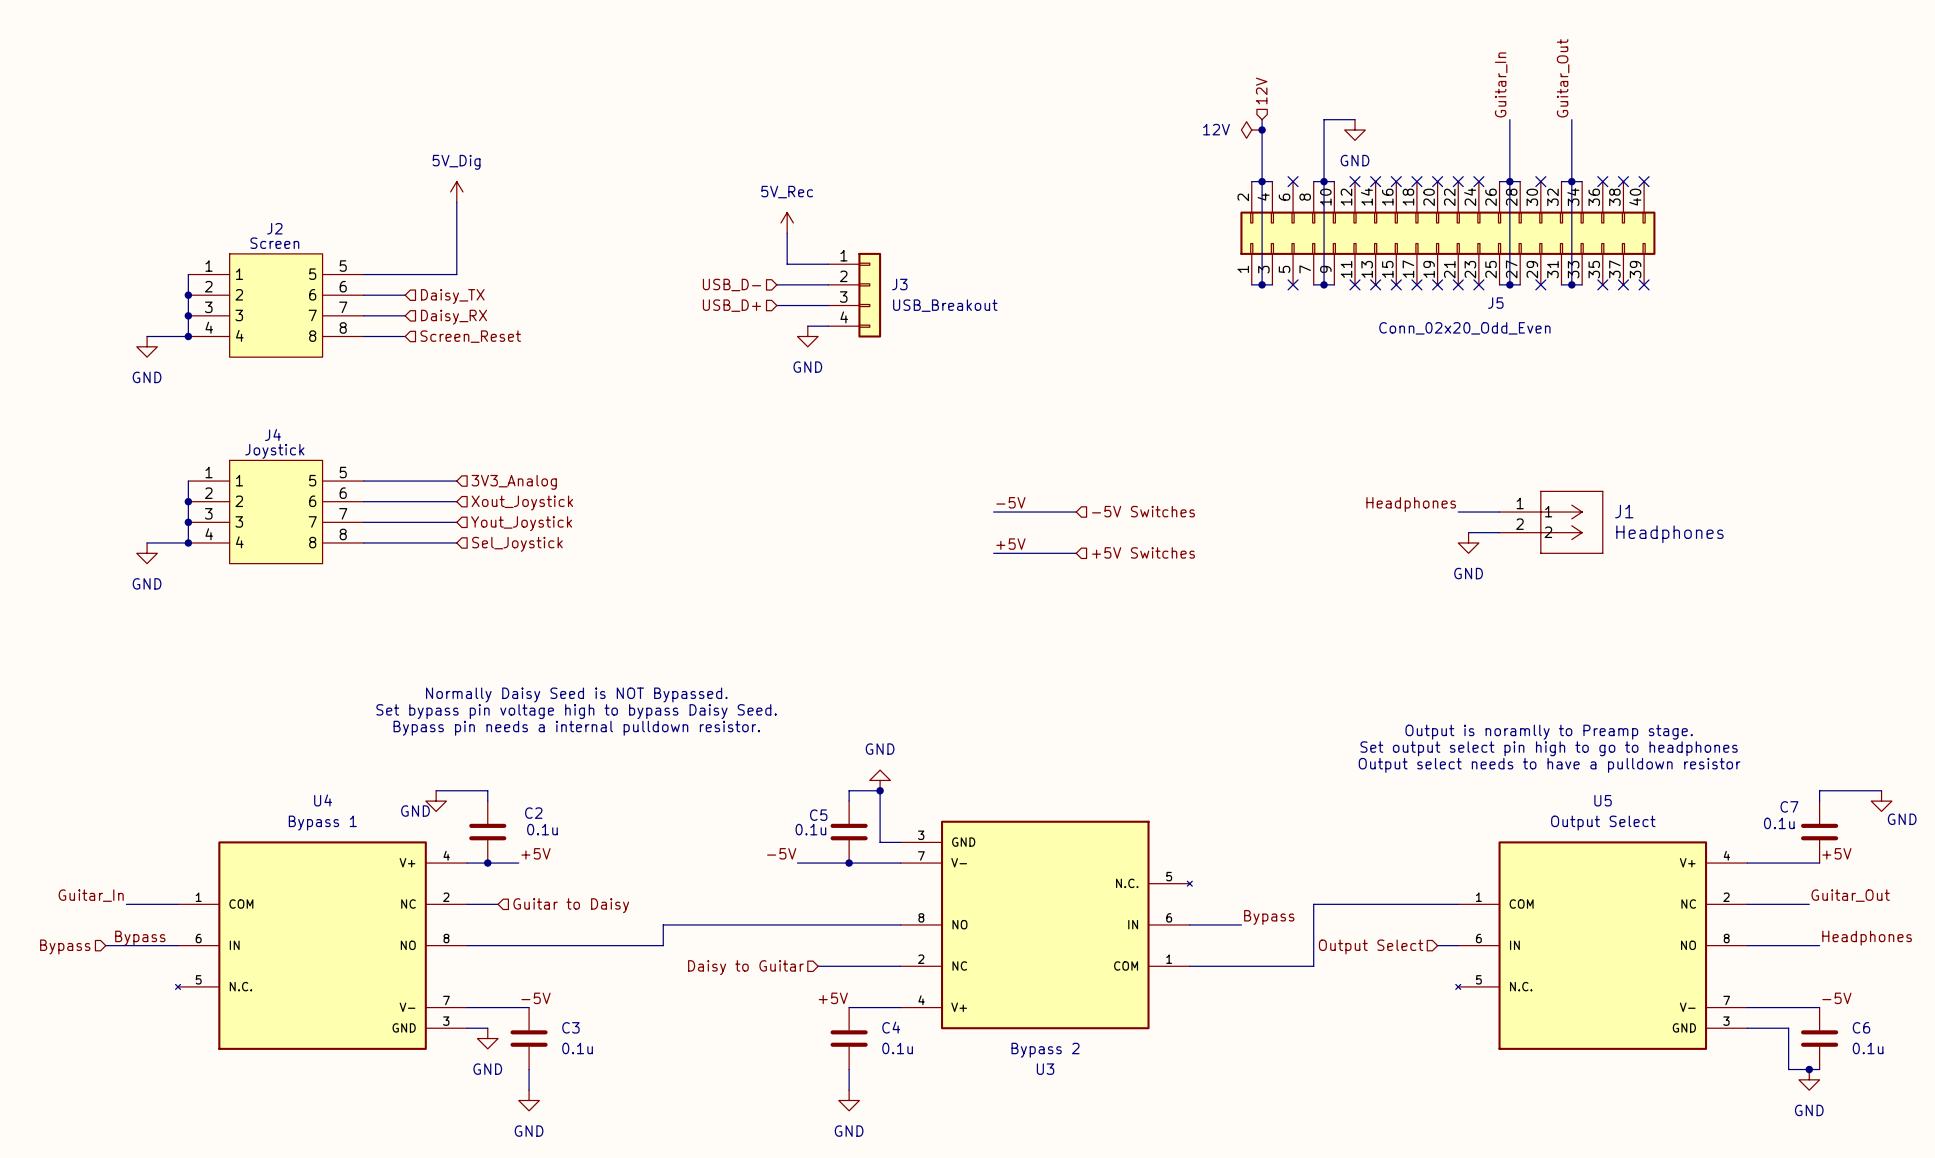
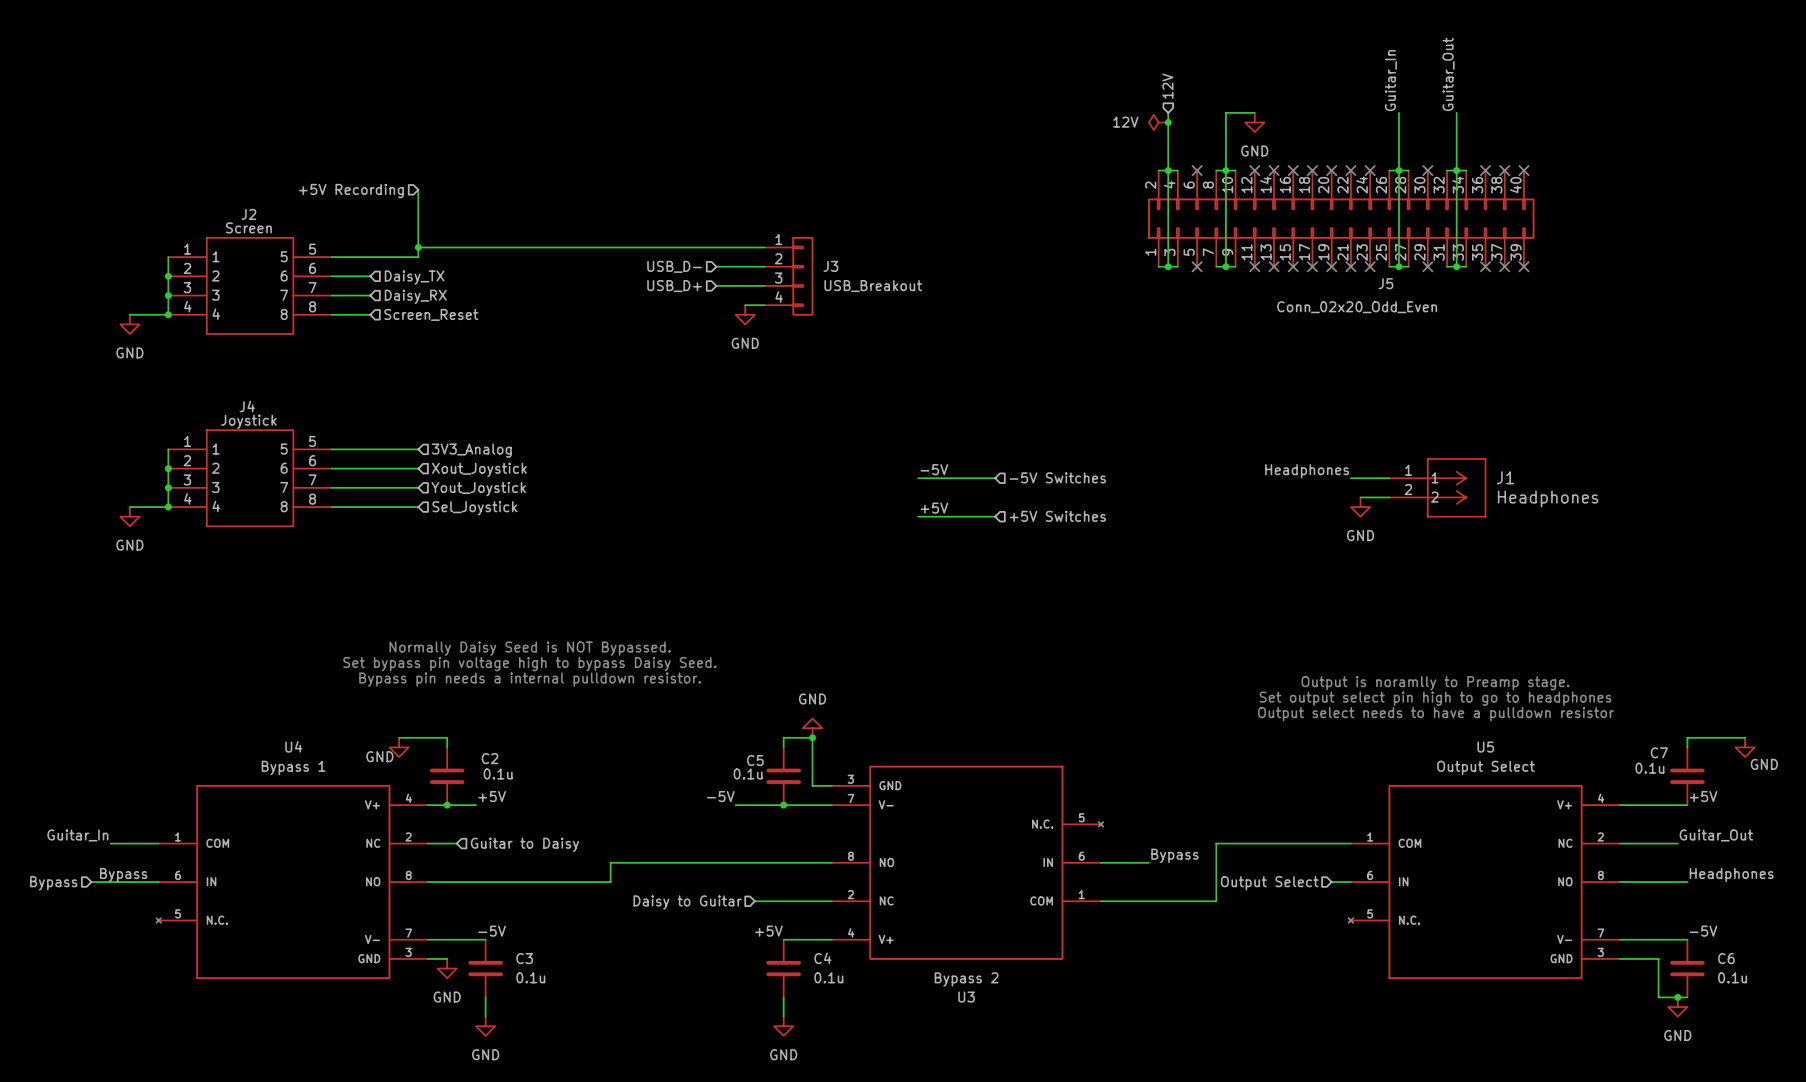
power symbol: 5V_Dig (456, 191) -> none
hierarchical label: none -> +5V Recording (351, 191)
power symbol: 5V_Rec (787, 222) -> none
wire: (787, 233) (787, 264) -> (418, 247) (726, 247)
junction: none -> (418, 247)

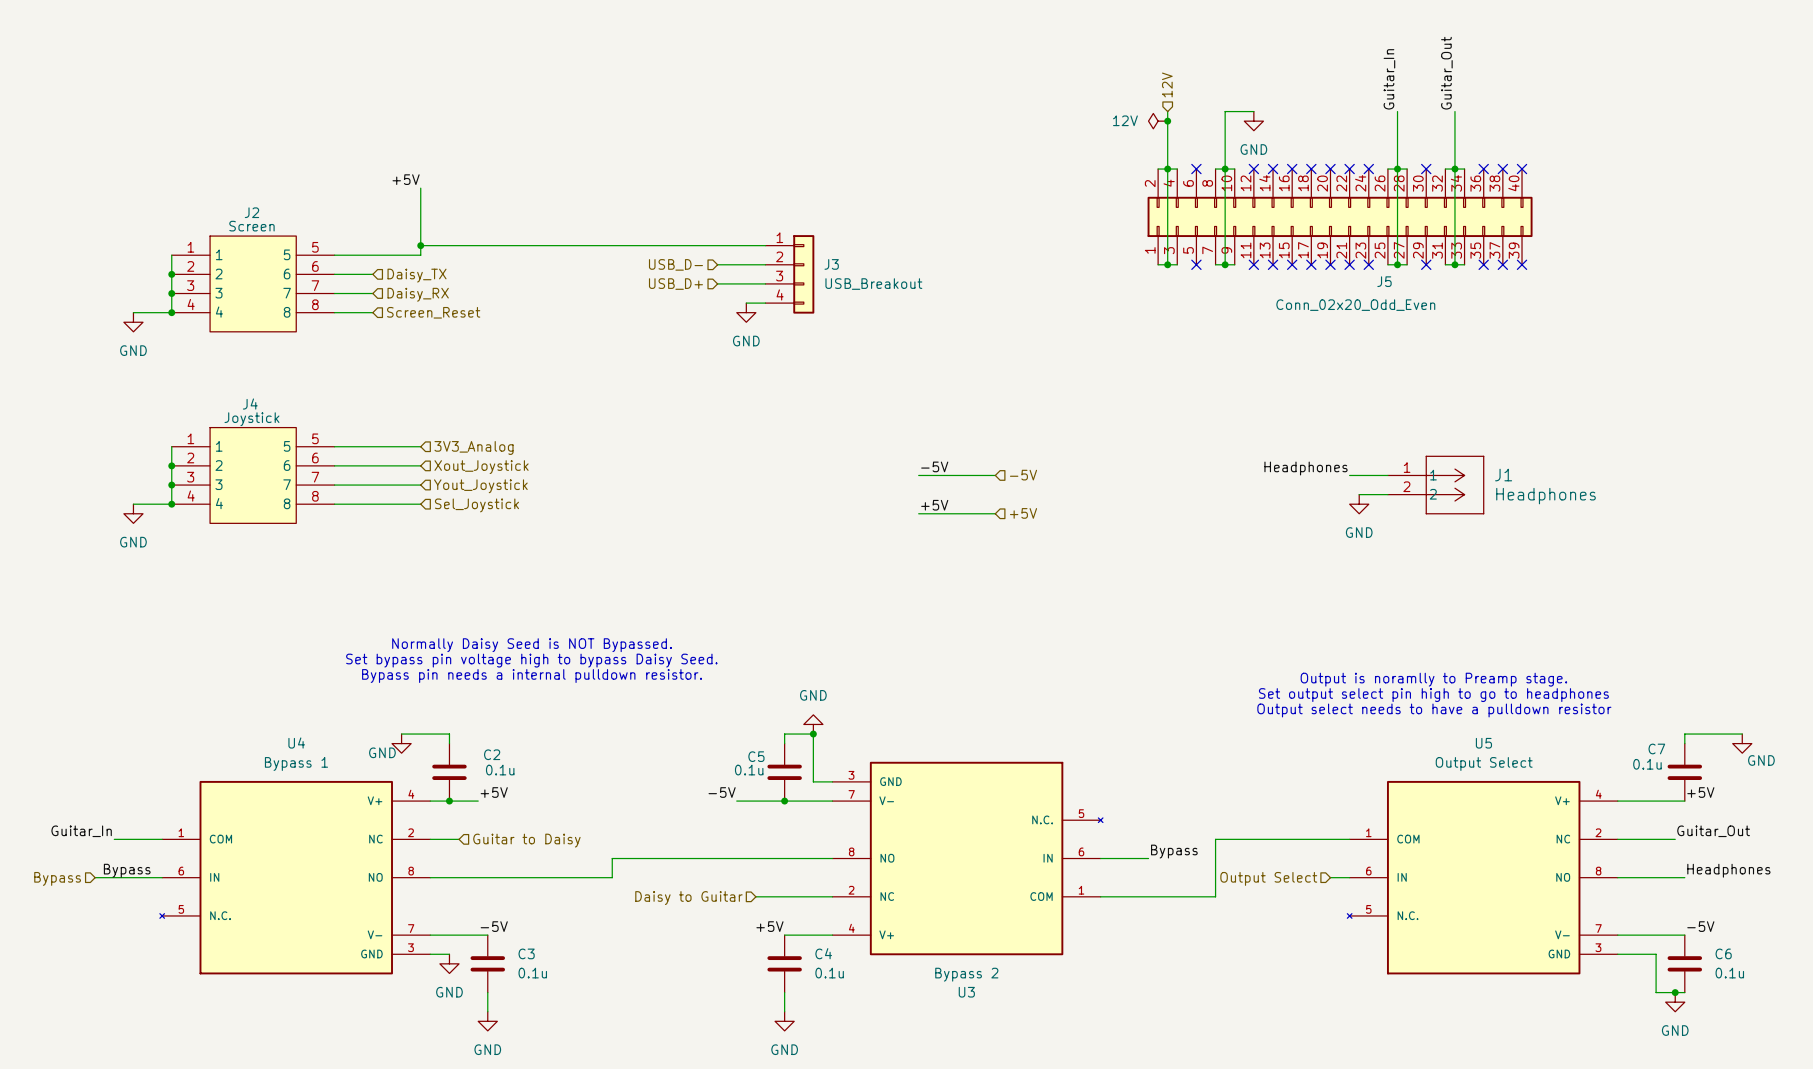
label: none -> +5V (406, 179)
hierarchical label: +5V Recording (351, 191) -> none
hierarchical label: -5V Switches (1057, 477) -> -5V (1023, 475)
hierarchical label: +5V Switches (1057, 516) -> +5V (1023, 513)

